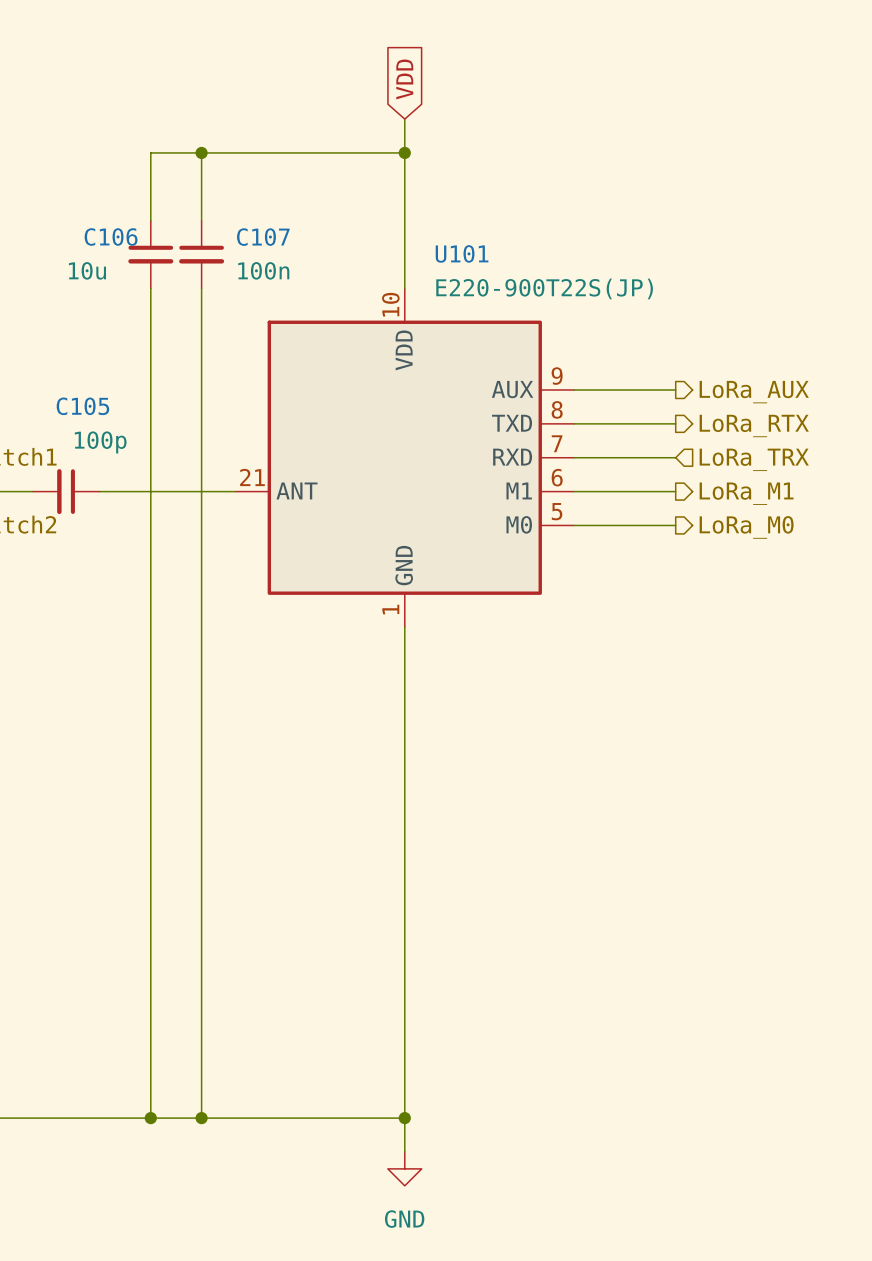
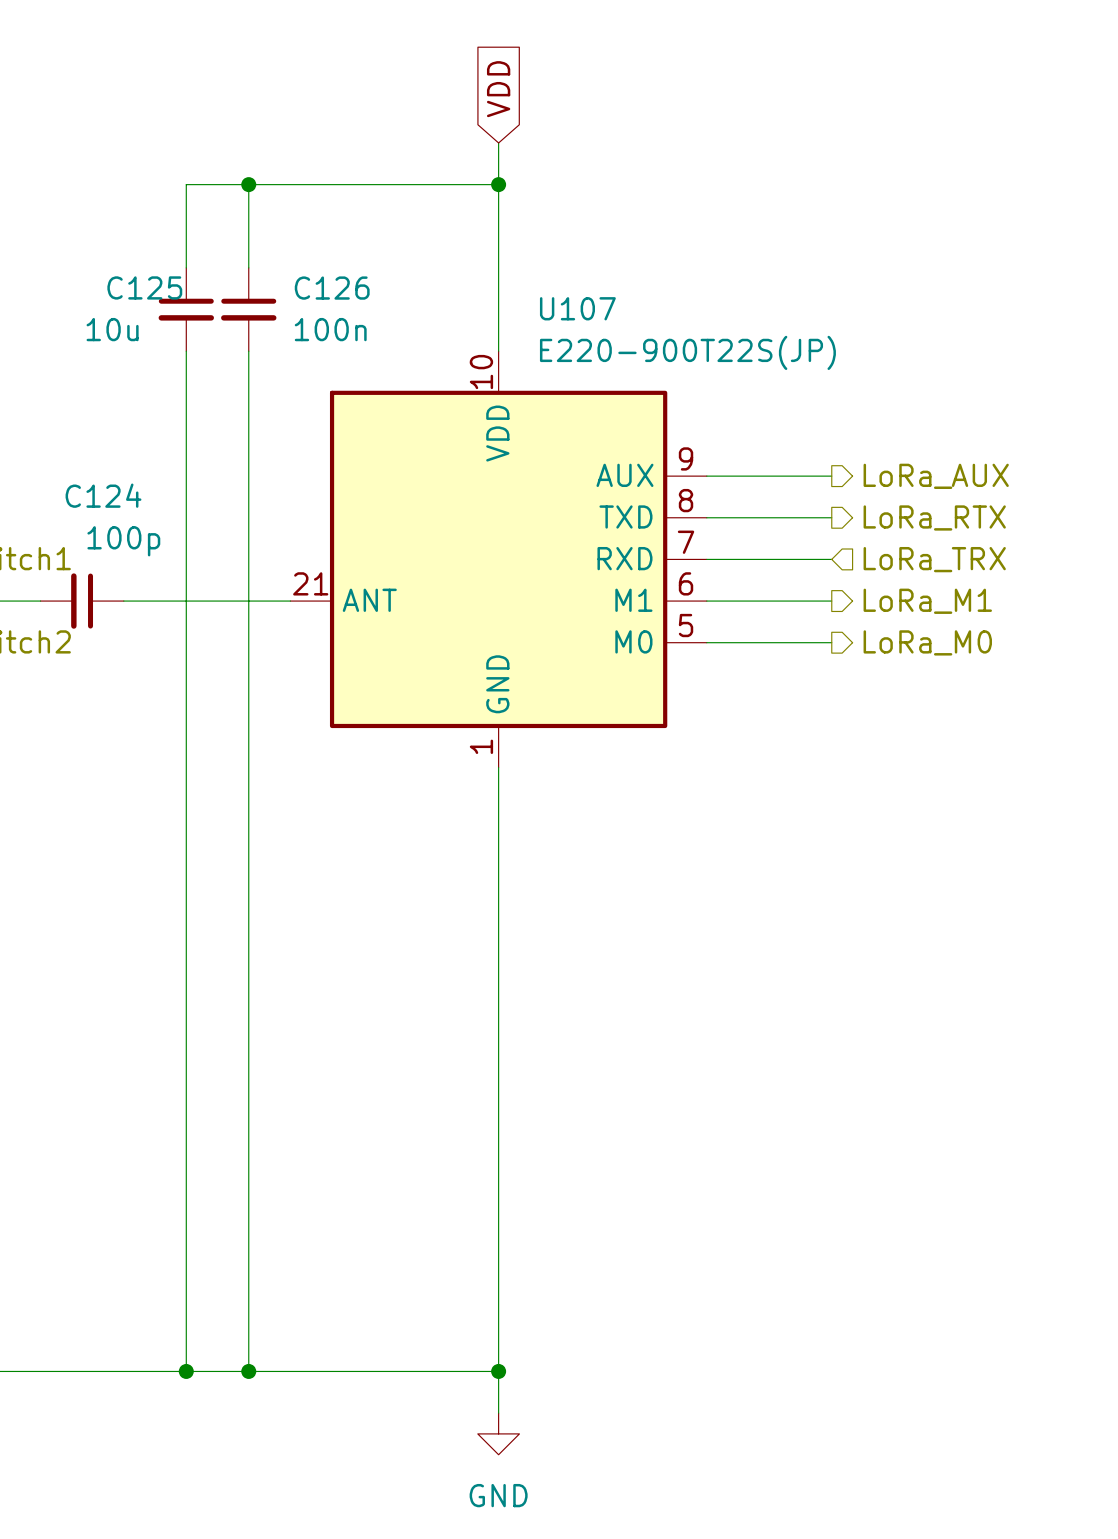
C106 name: C106 (111, 237) -> C125 (144, 287)
C107 name: C107 (263, 237) -> C126 (332, 288)
U101 name: U101 (462, 253) -> U107 (577, 308)
C105 name: C105 (82, 406) -> C124 (103, 495)

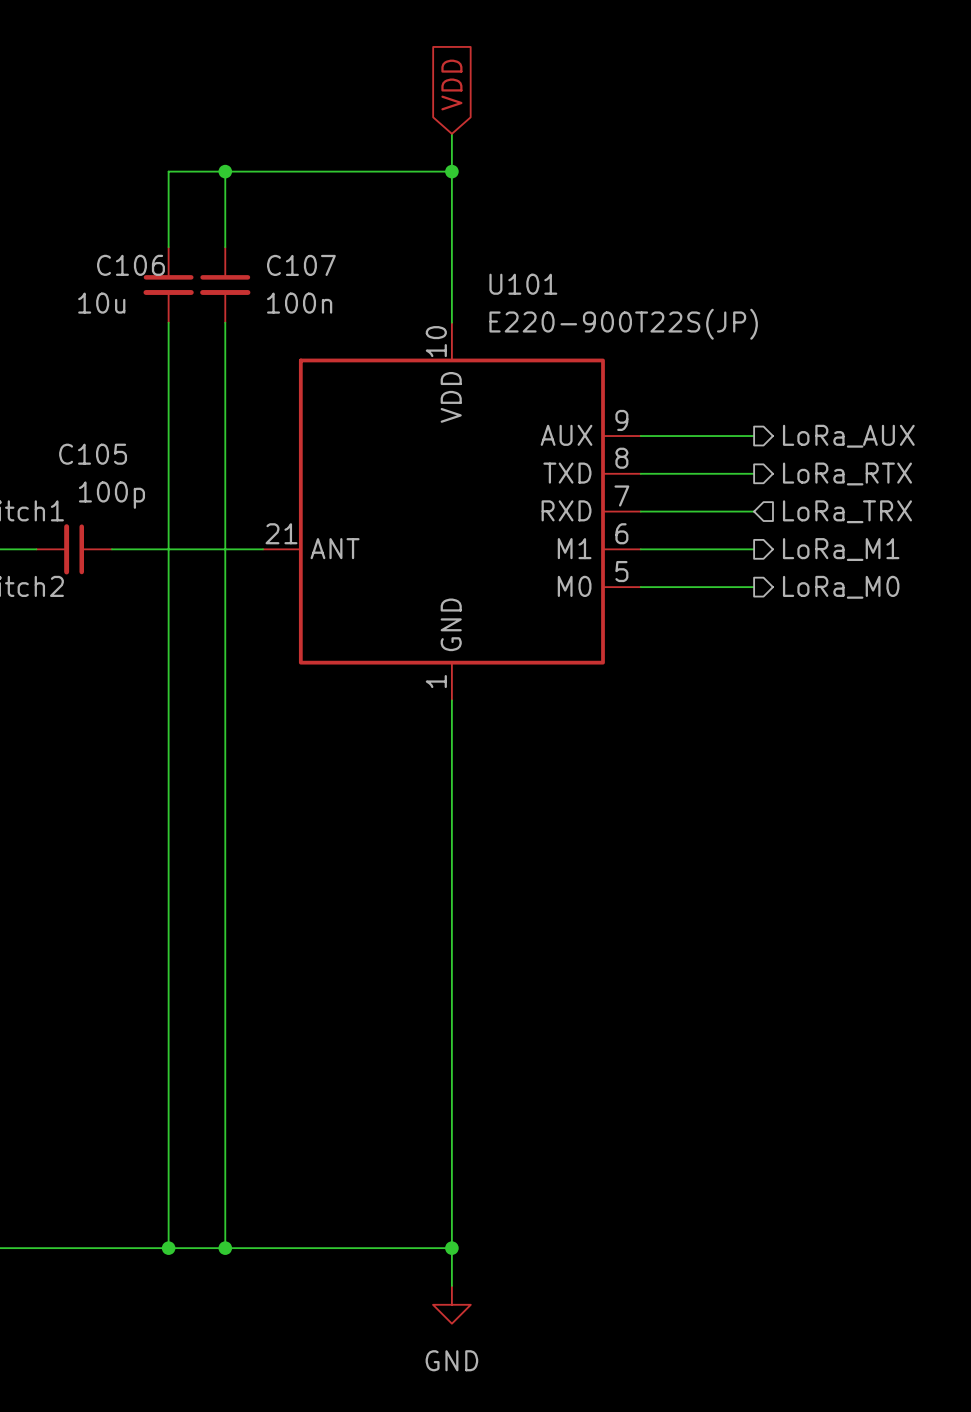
C125 name: C125 (144, 287) -> C106 (130, 265)
C126 name: C126 (332, 288) -> C107 (301, 265)
U107 name: U107 (577, 308) -> U101 (523, 284)
C124 name: C124 (103, 495) -> C105 (93, 454)

